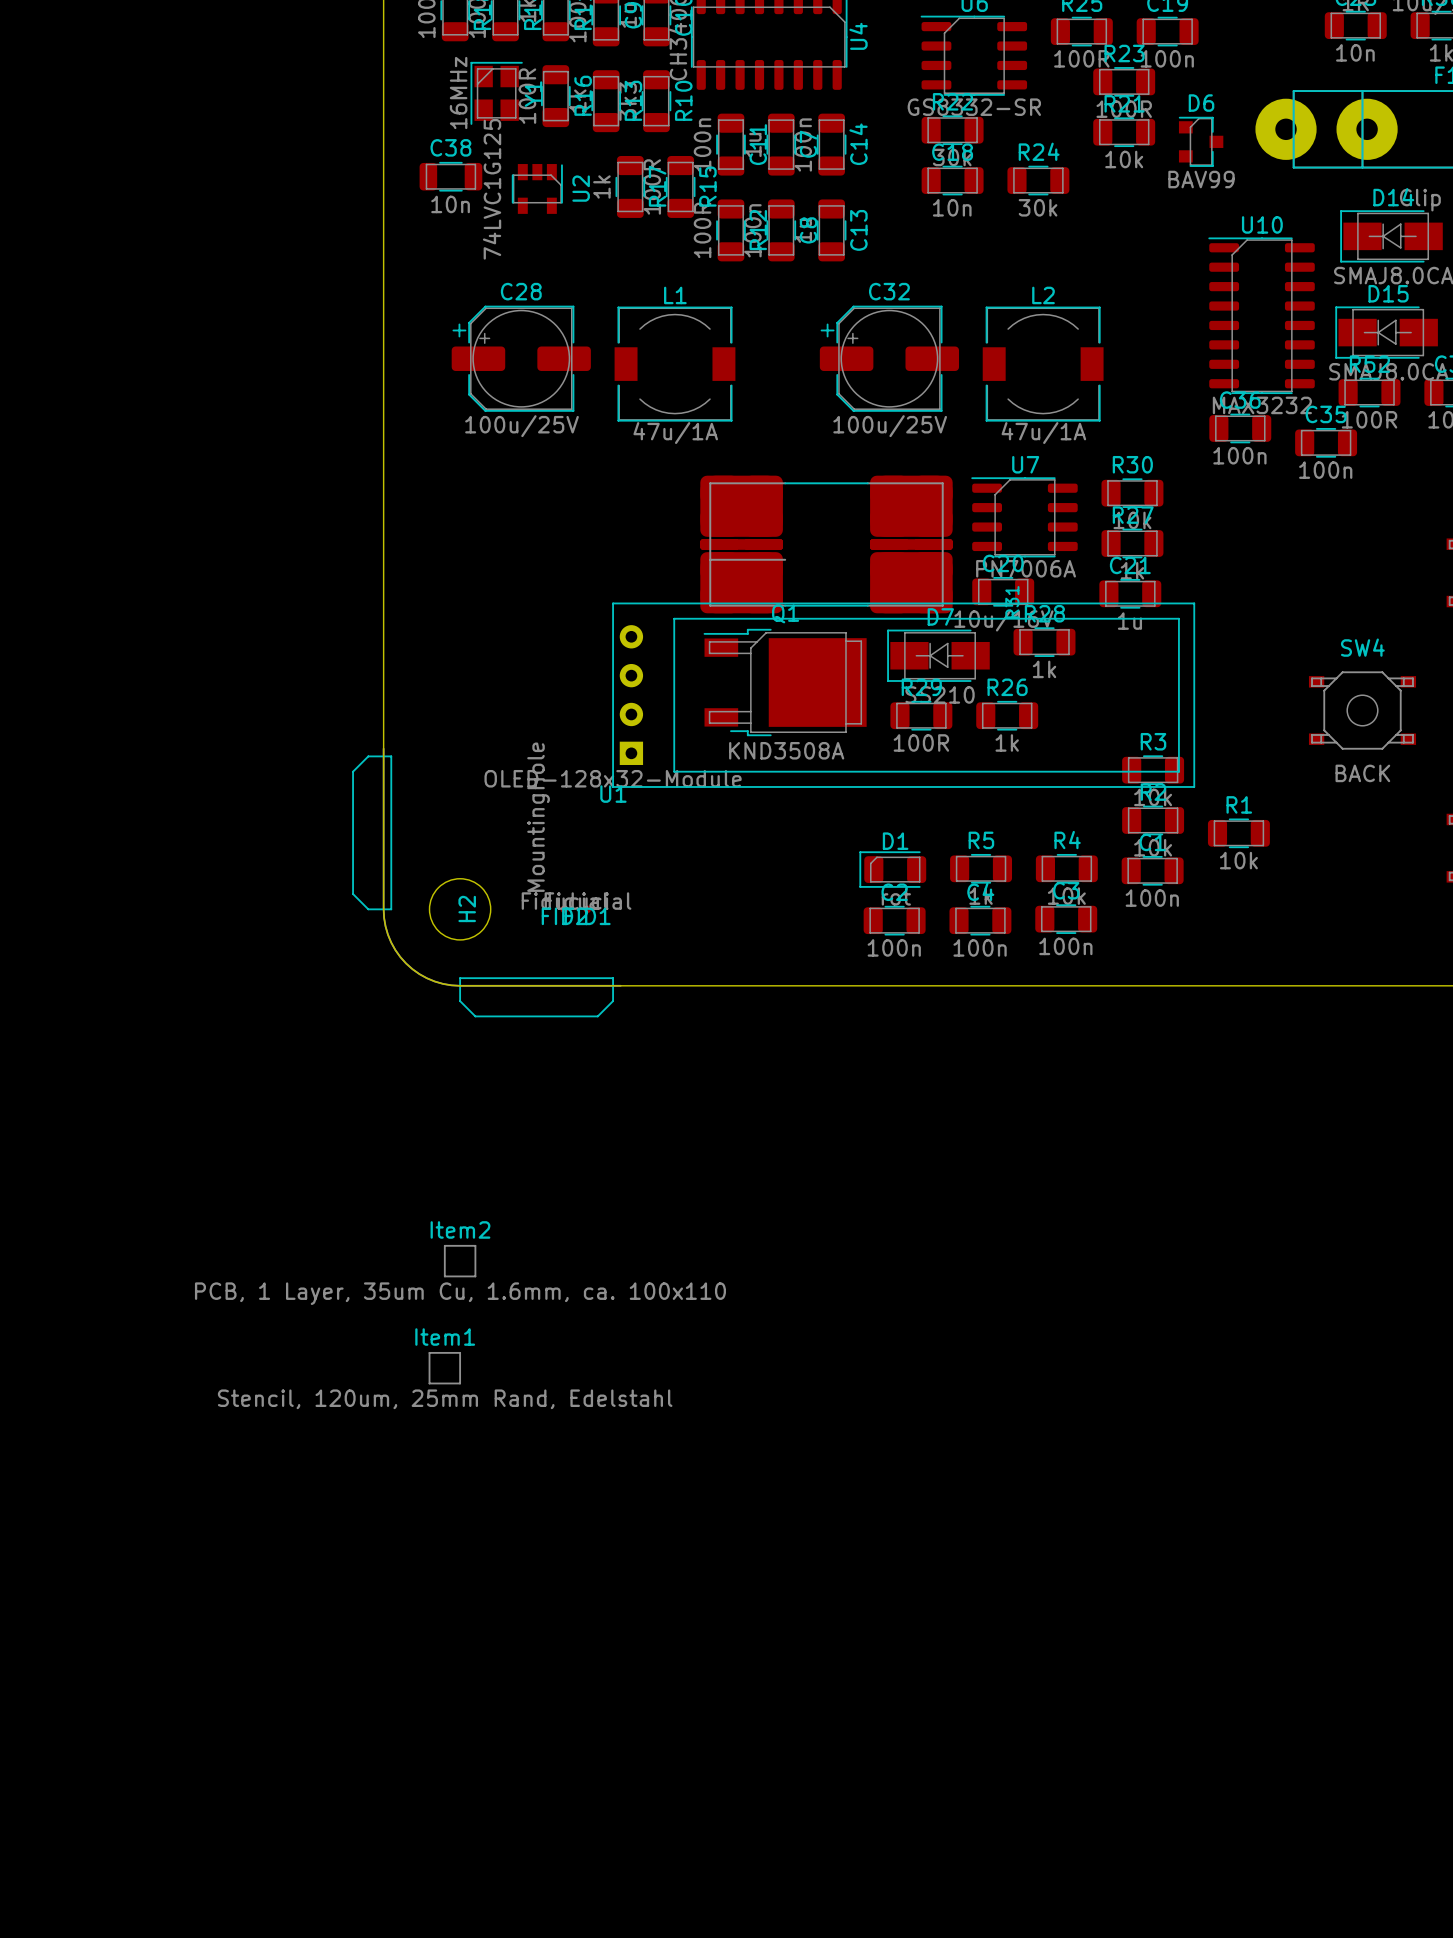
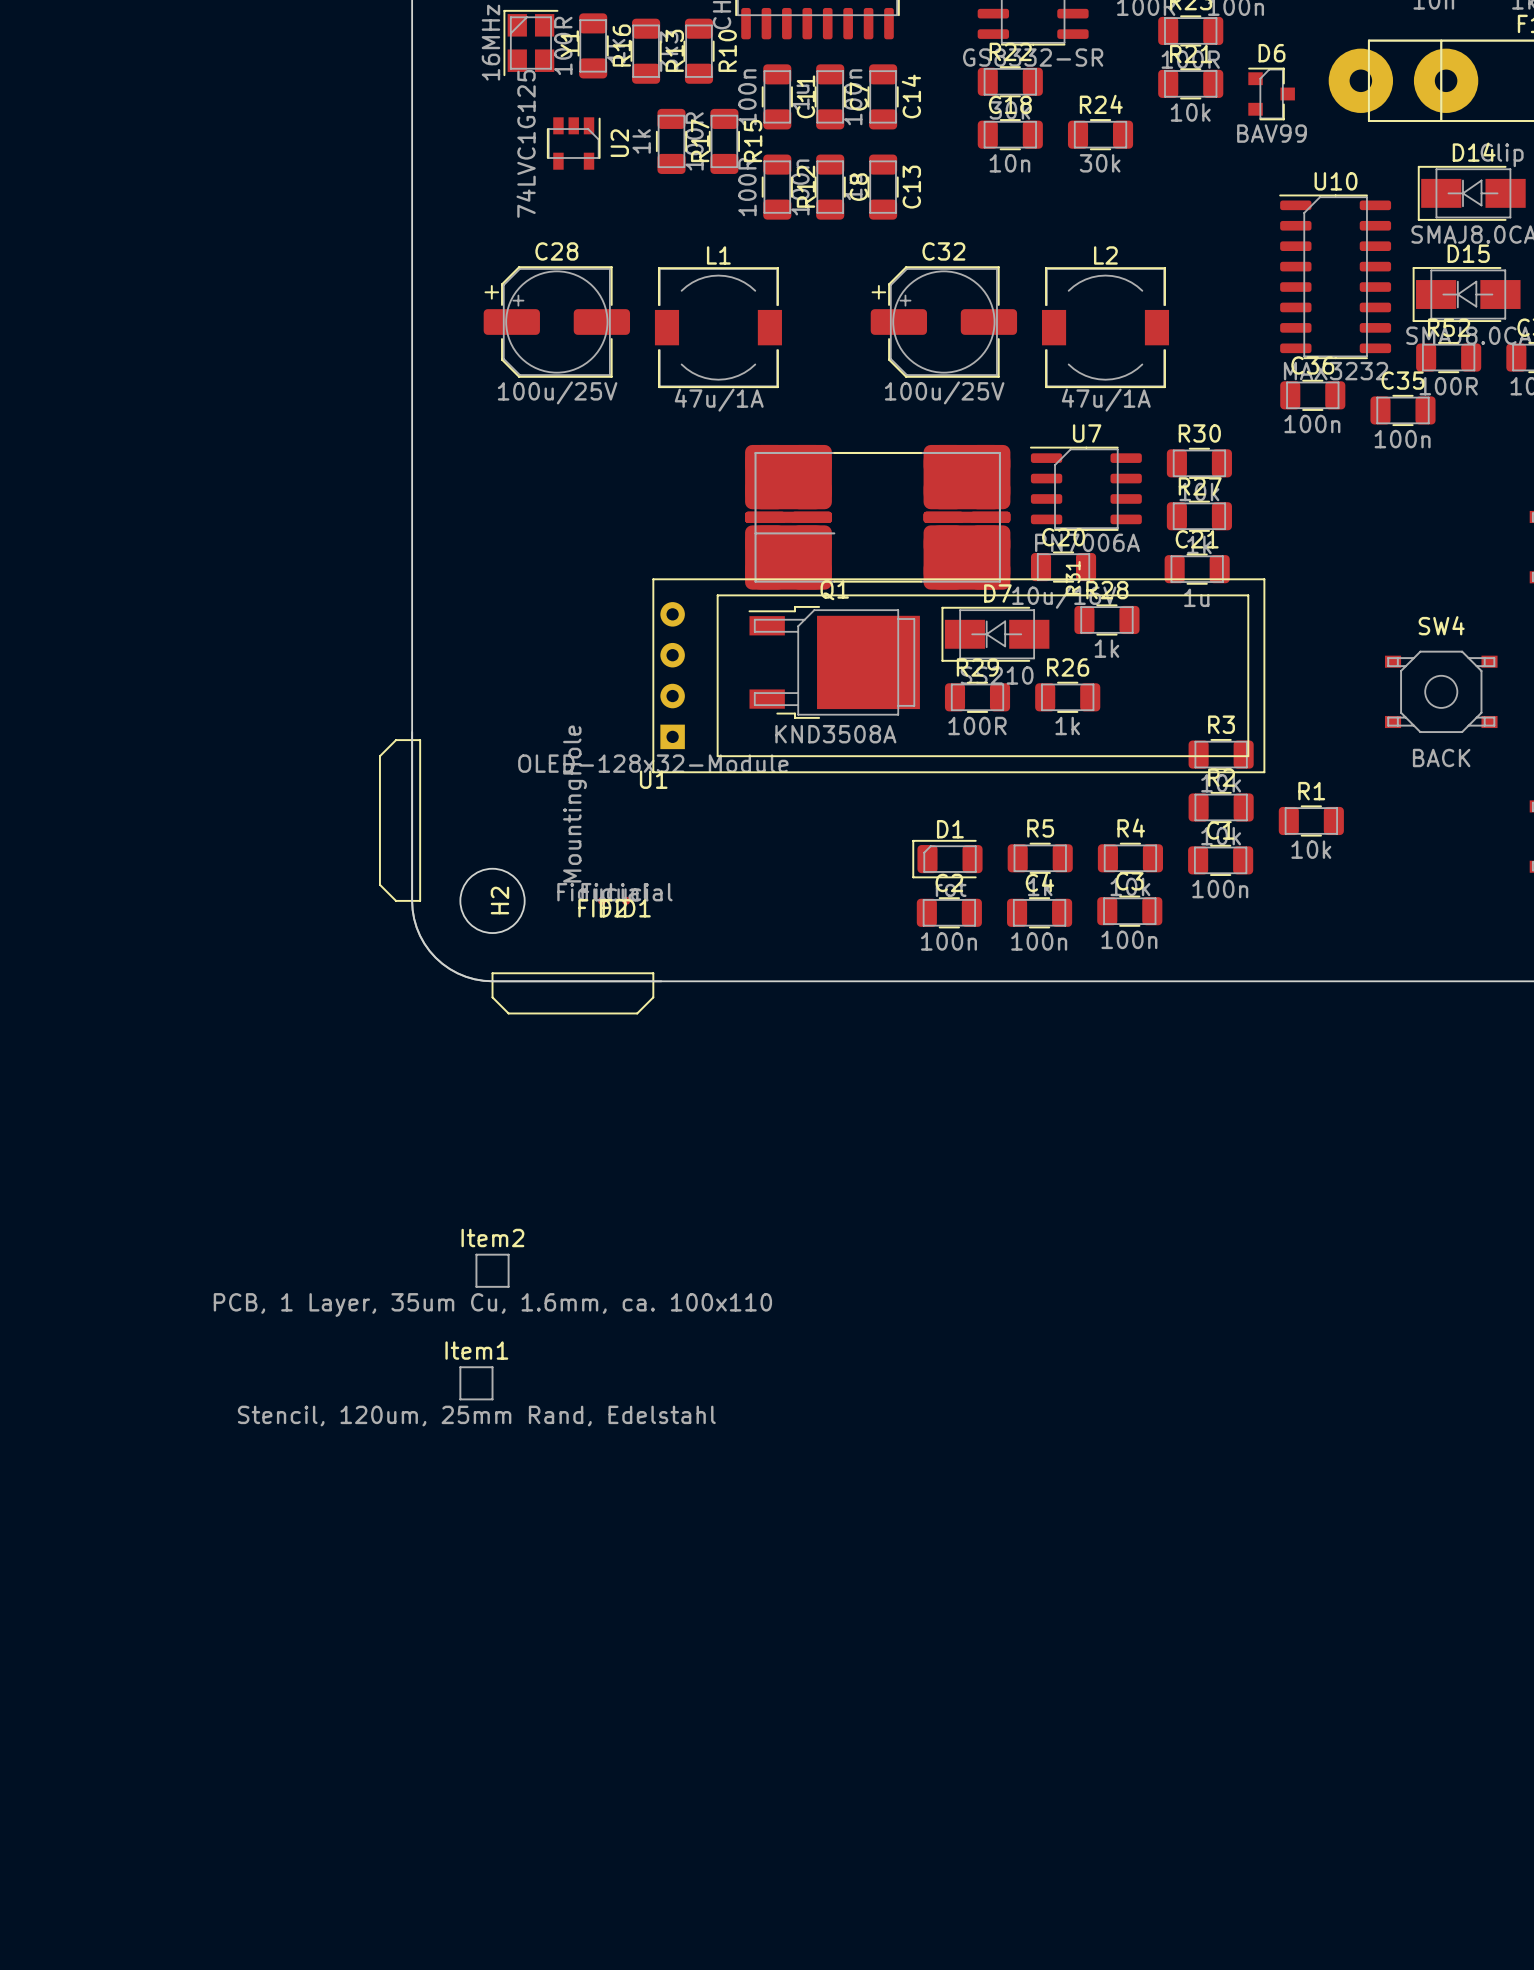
C38: 10n (450, 176) -> none

